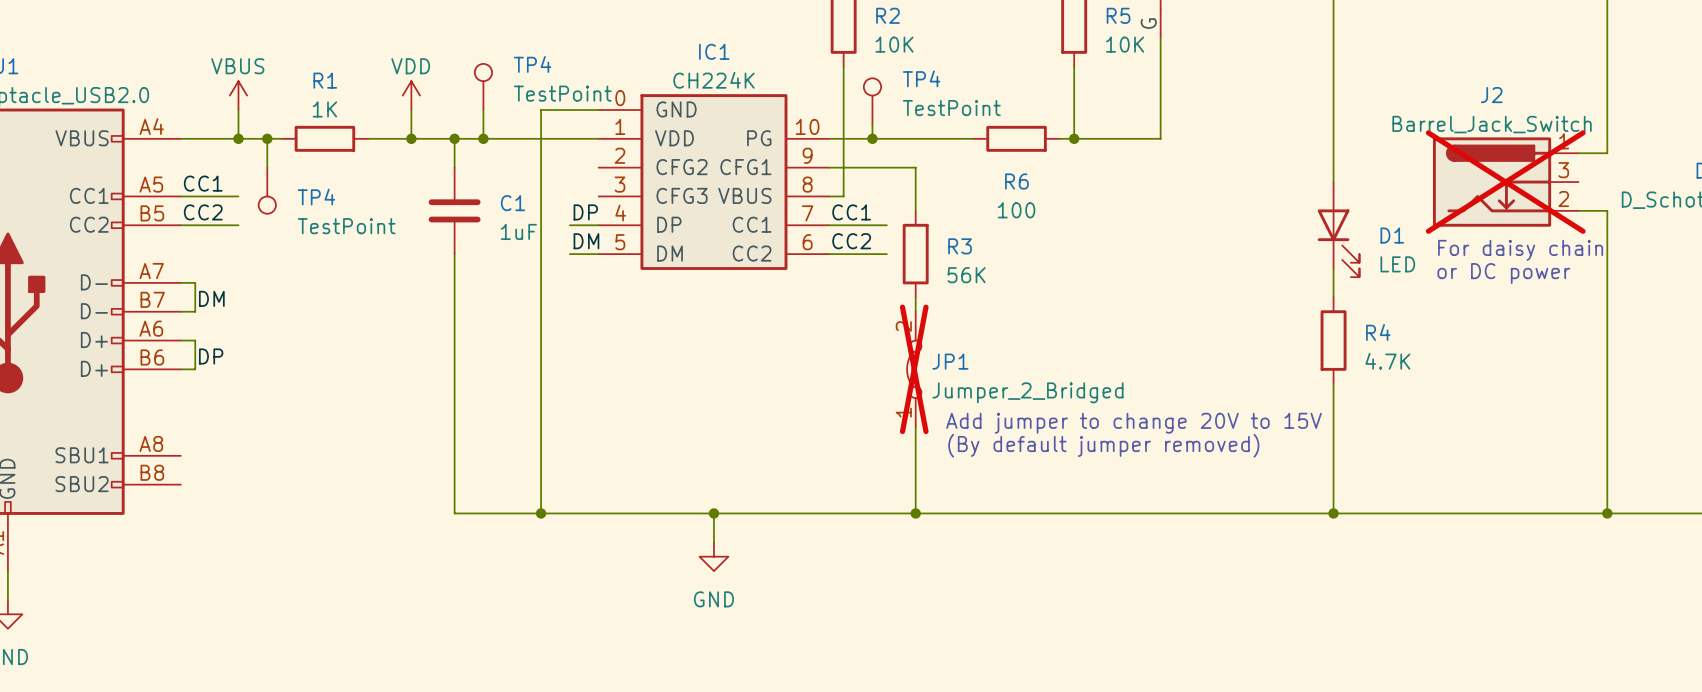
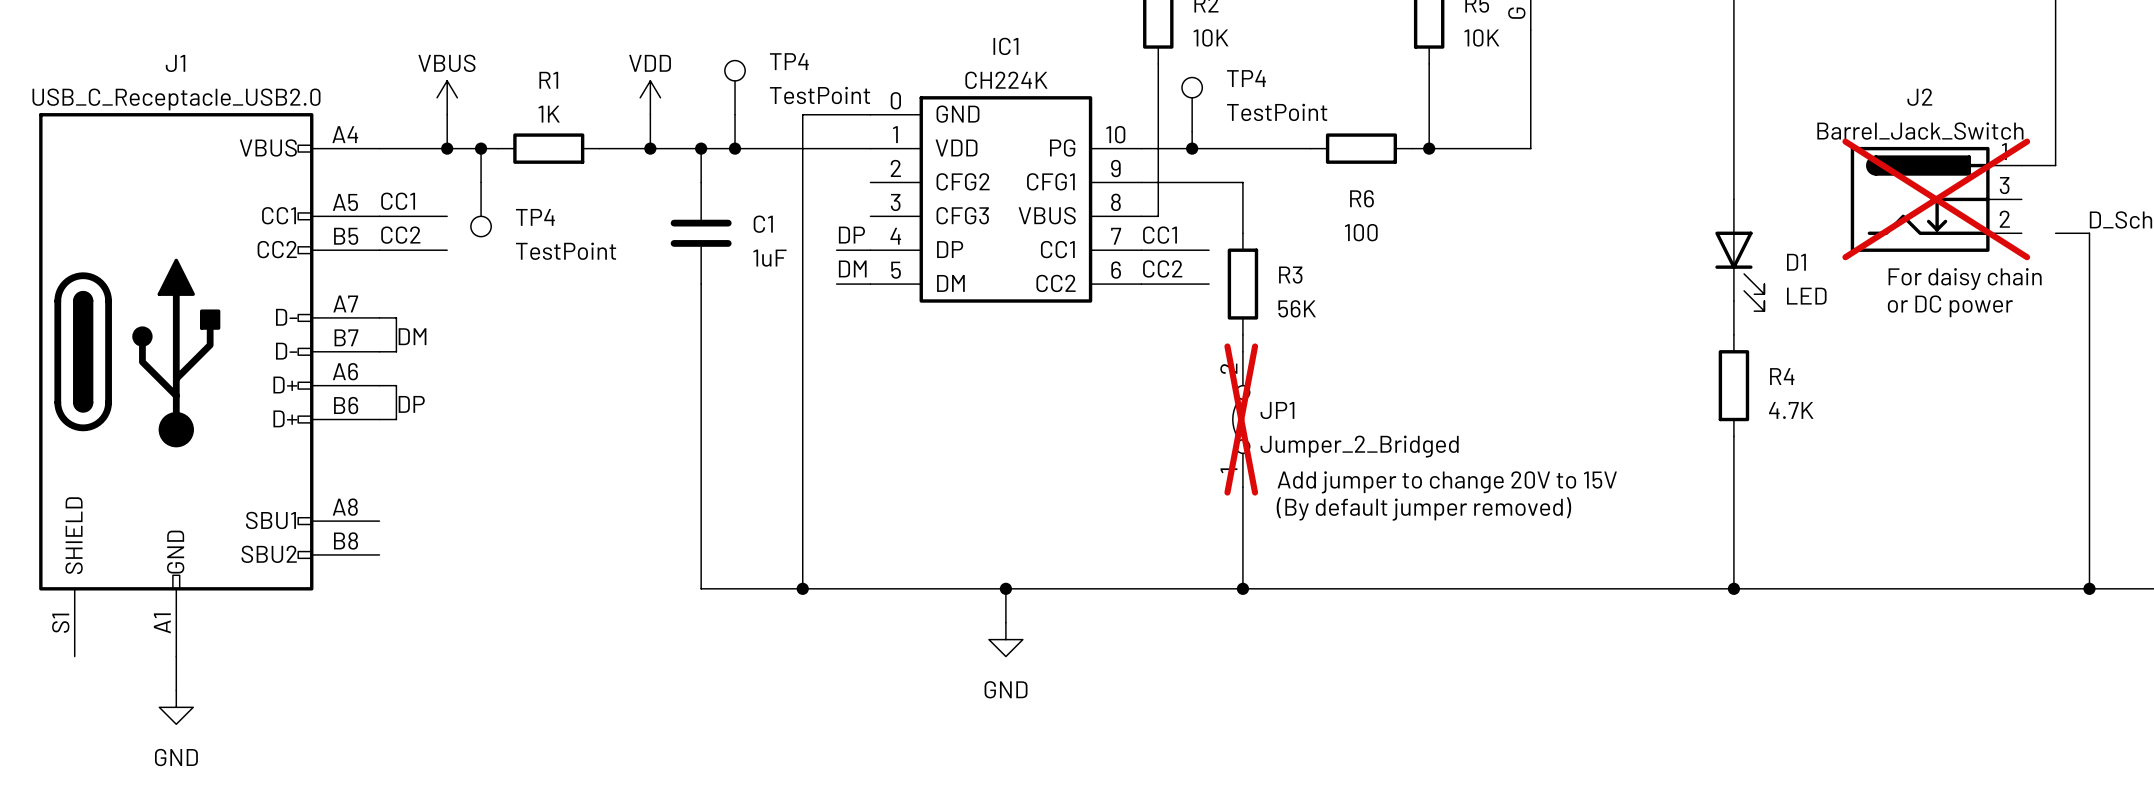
wire: (1578, 210) (1607, 210) (1607, 513) -> (2055, 233) (2089, 233) (2089, 588)
text position: For daisy chain (1520, 250) -> For daisy chain (1965, 279)
text position: or DC power (1503, 273) -> or DC power (1950, 306)
junction position: (1607, 513) -> (2089, 588)

